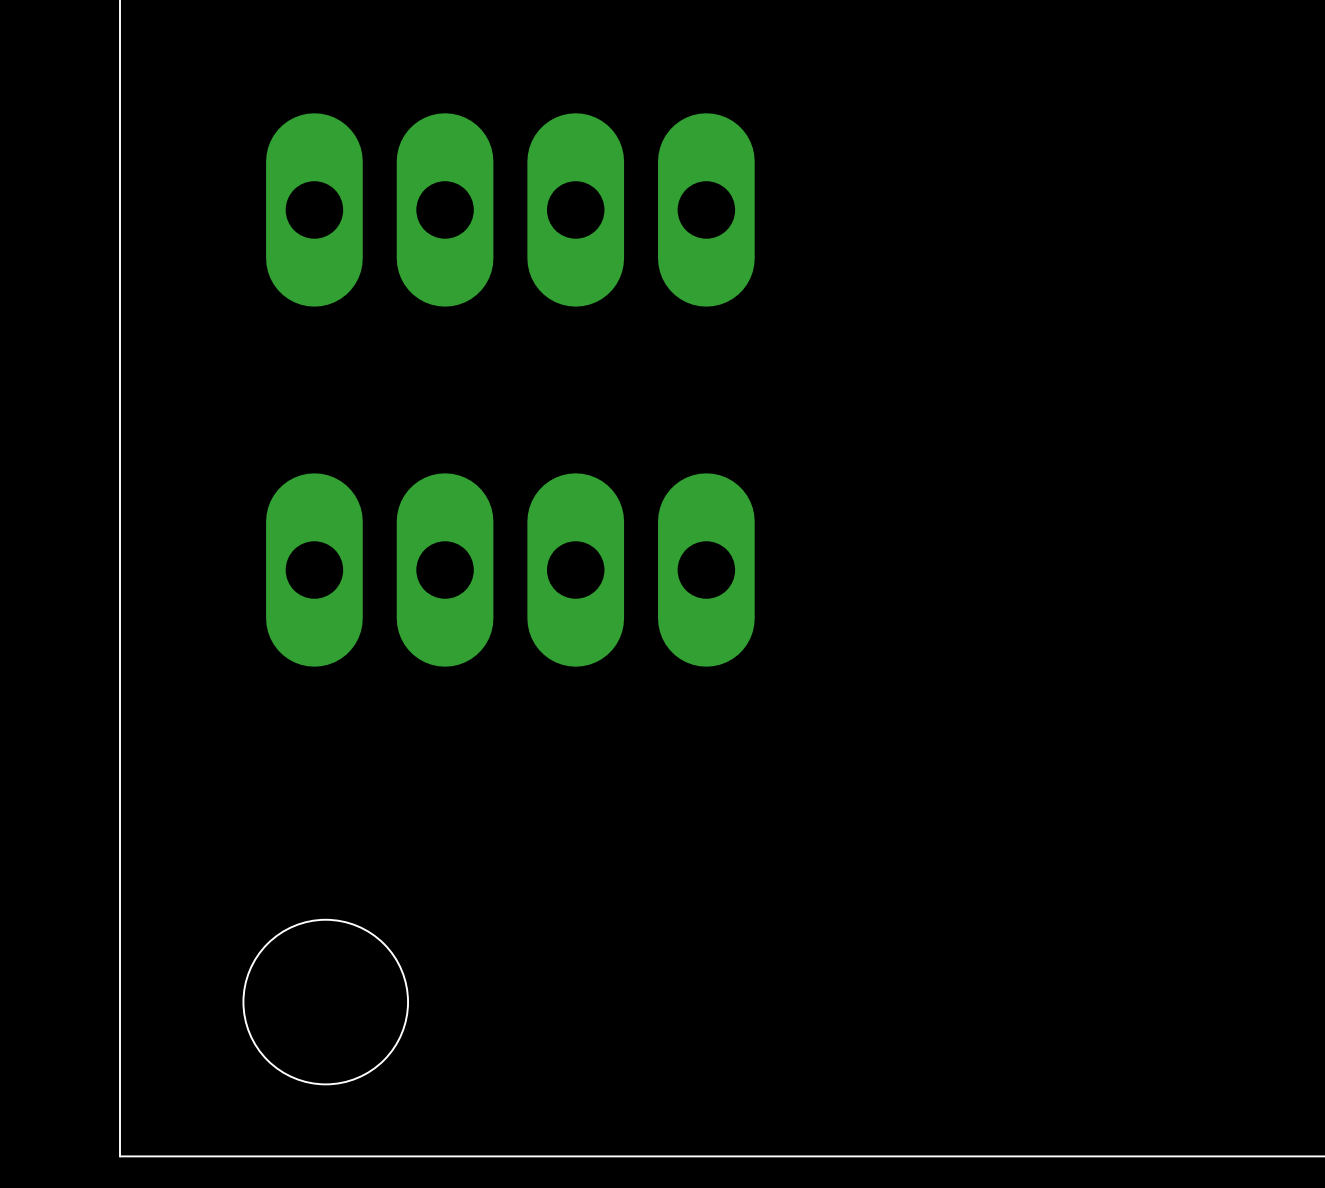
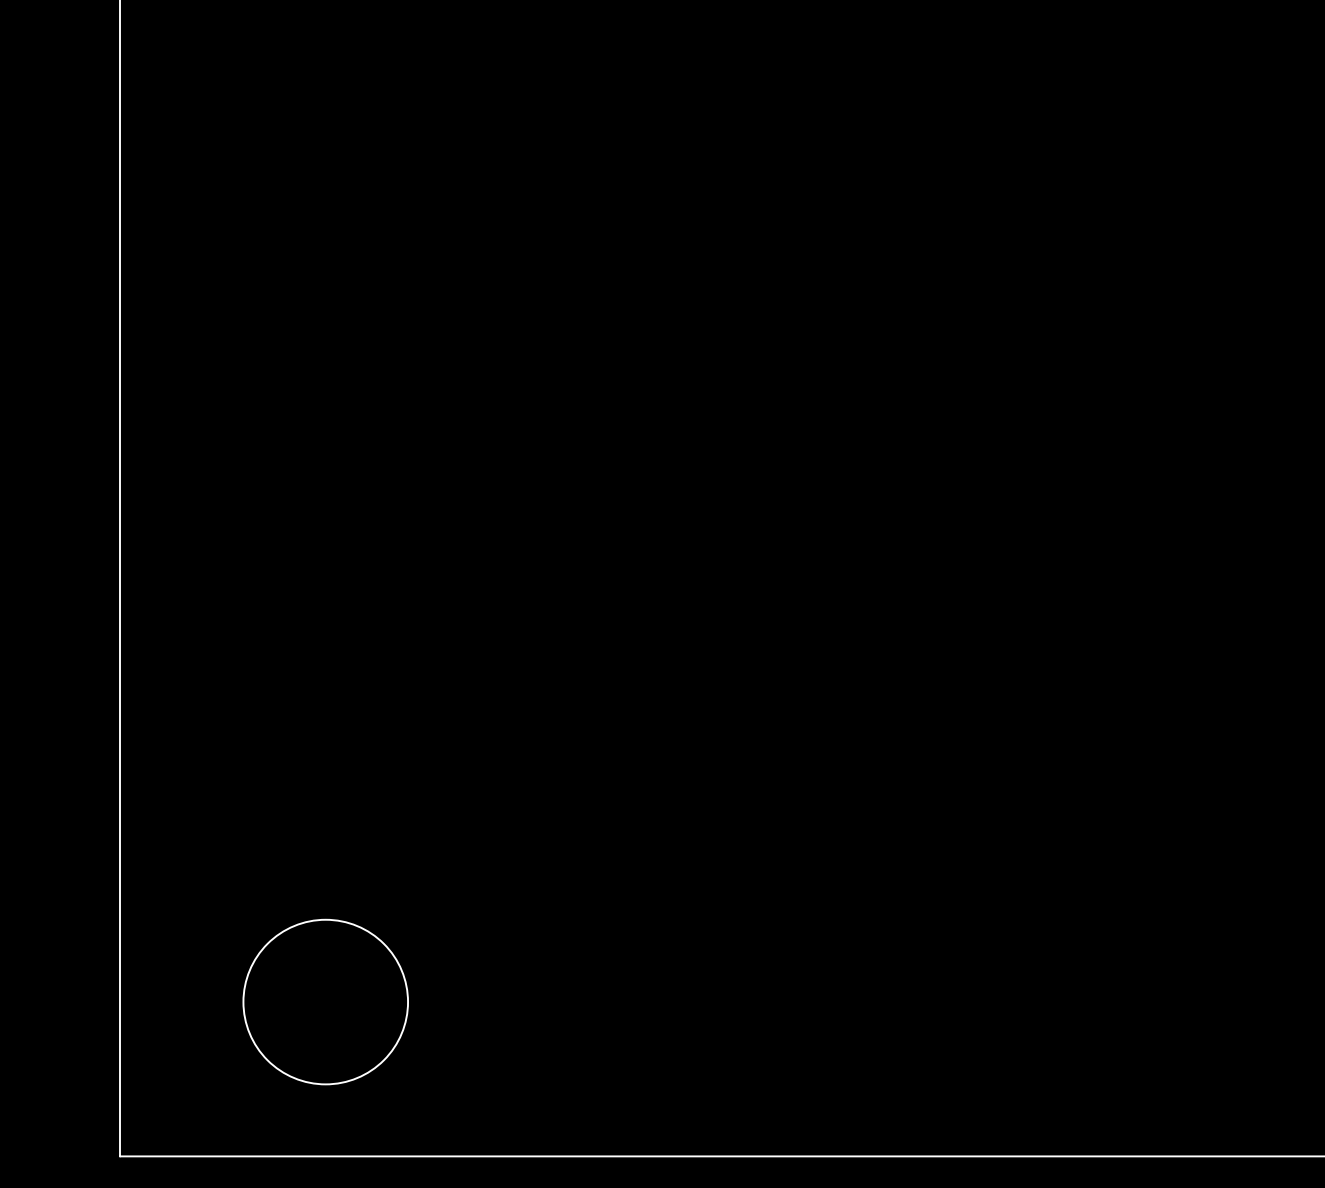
part: (510, 209) -> none
part: (510, 570) -> none

